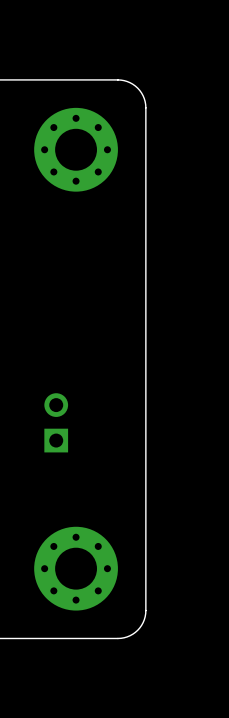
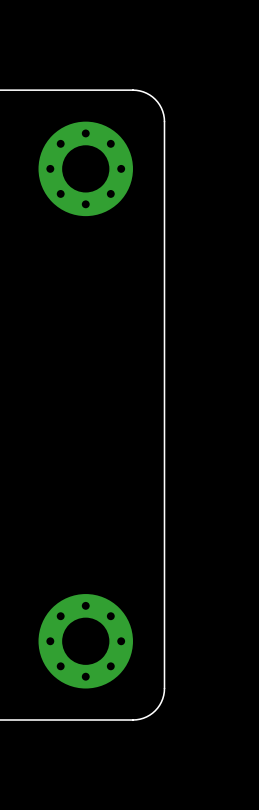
part: (56, 422) -> none

